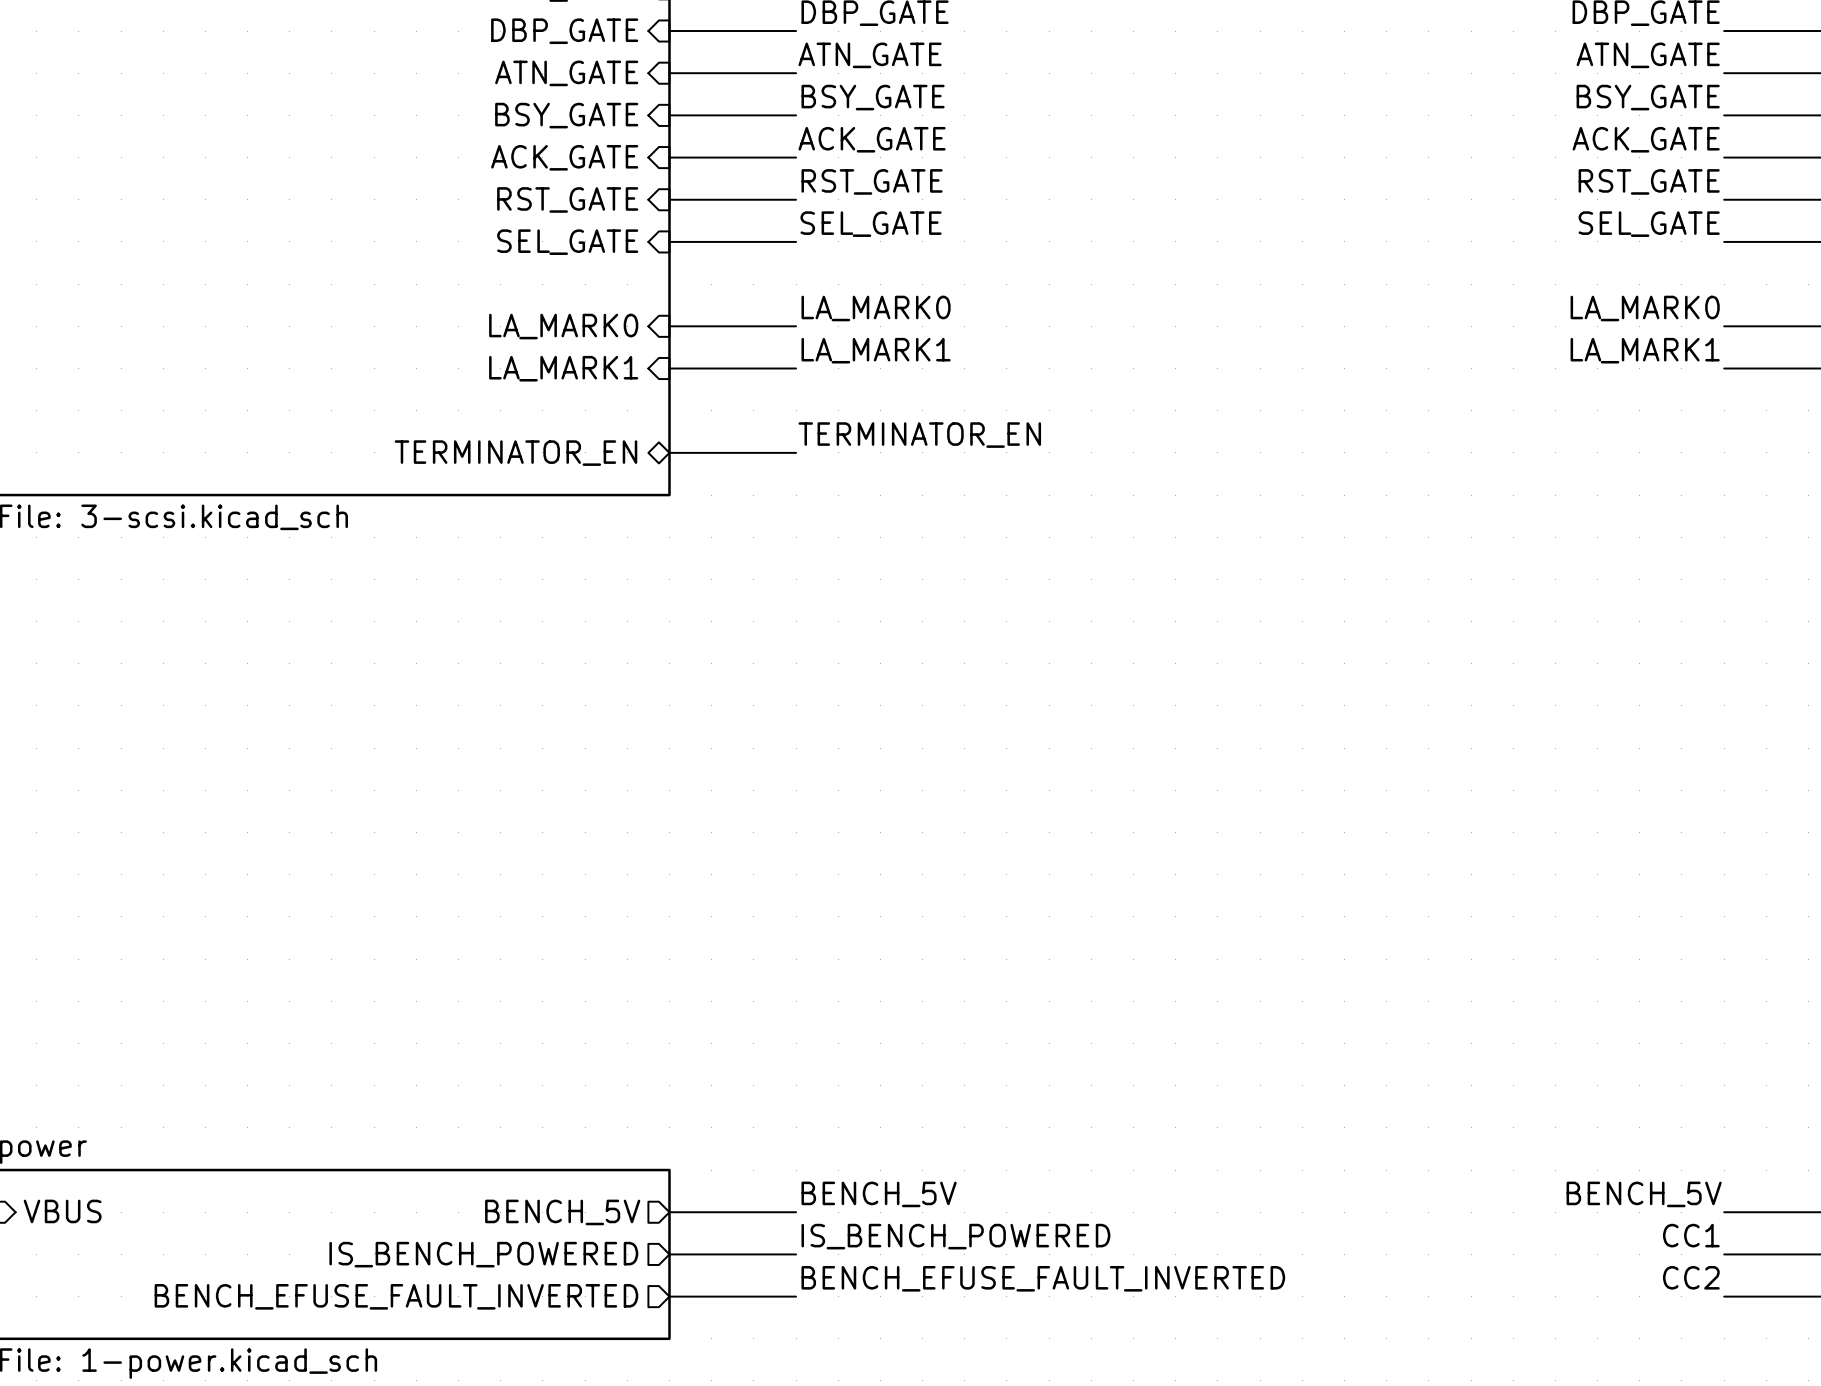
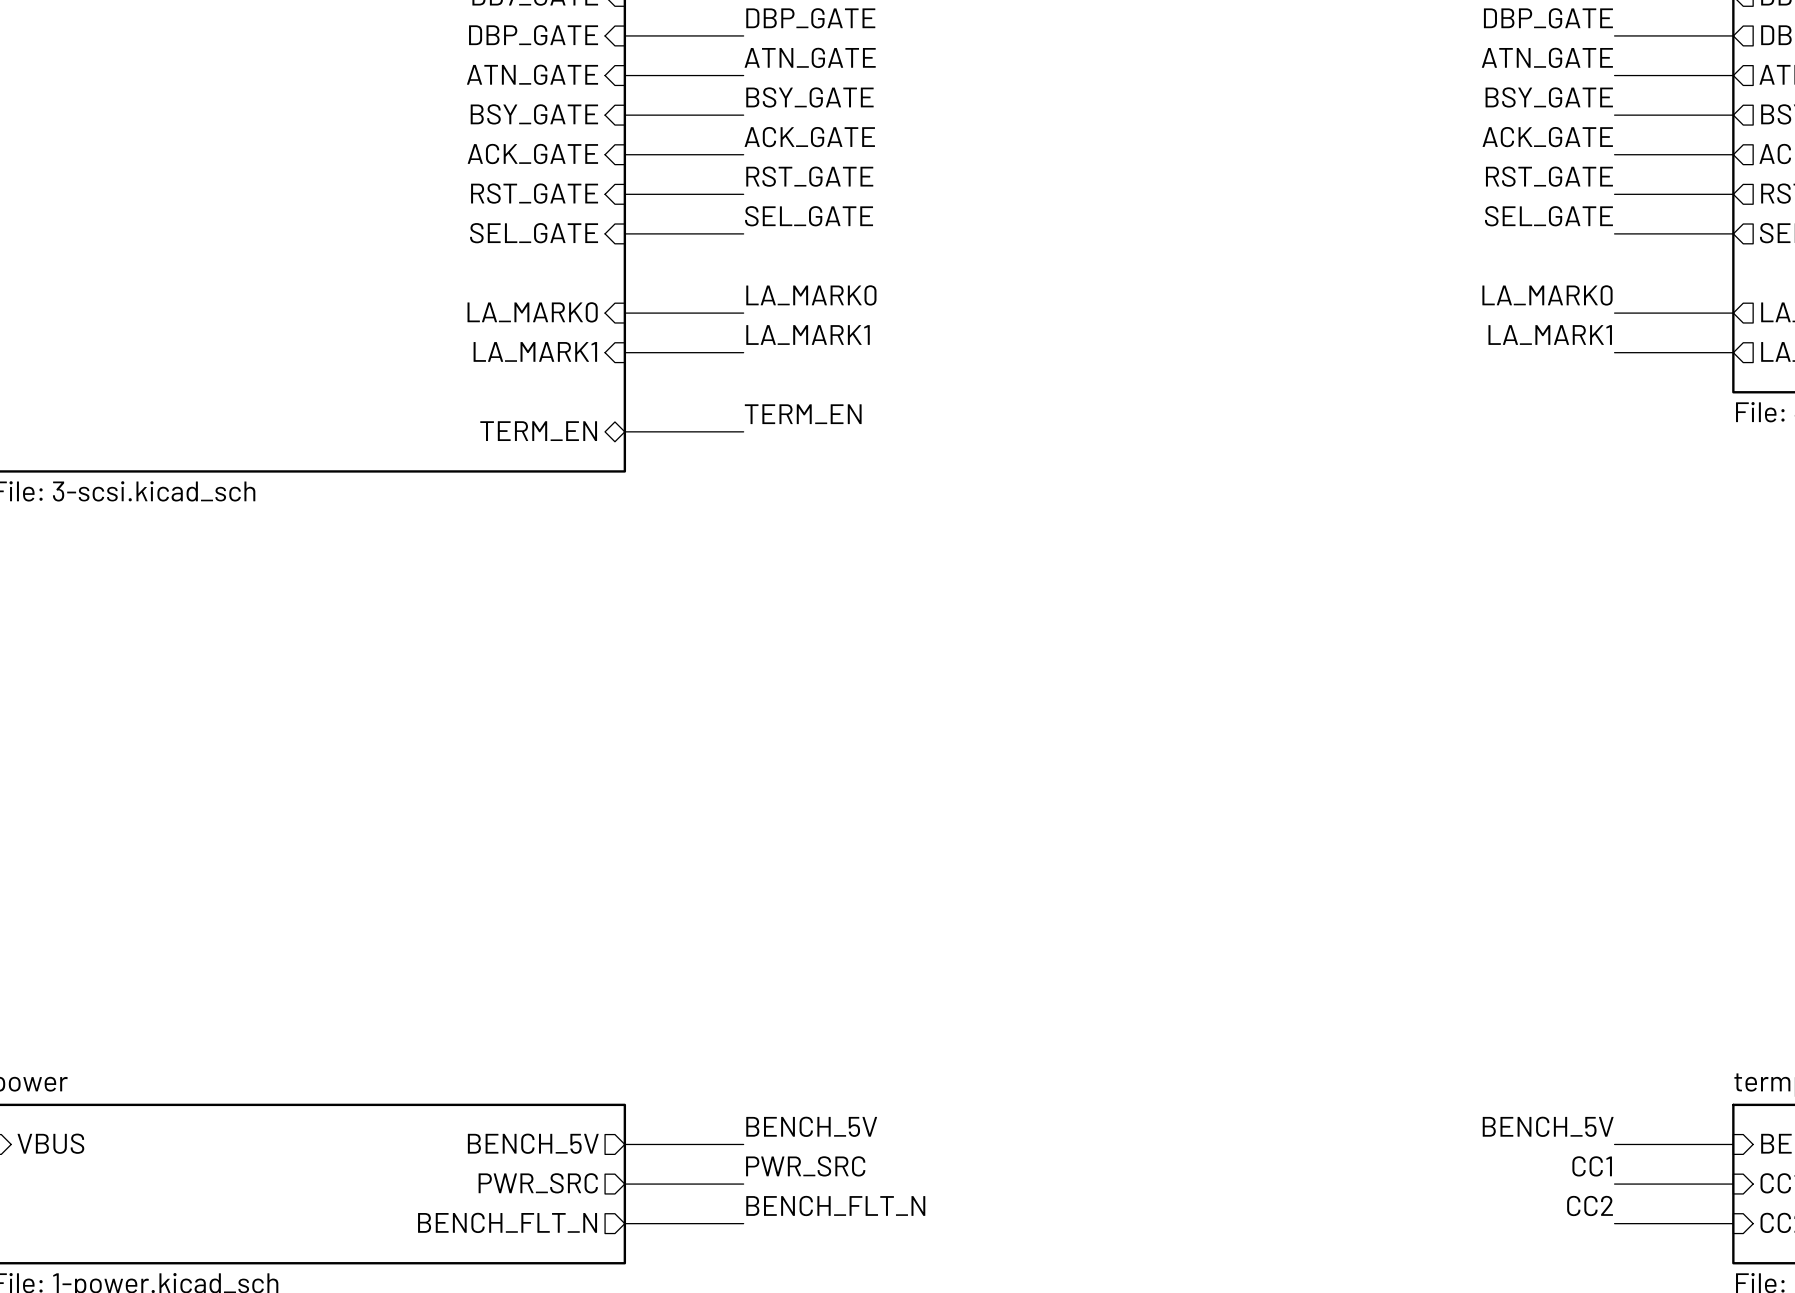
label: TERMINATOR_EN (919, 435) -> TERM_EN (803, 414)
sheet pin: TERMINATOR_EN (515, 453) -> TERM_EN (538, 431)
label: IS_BENCH_POWERED (955, 1236) -> PWR_SRC (805, 1166)
sheet pin: IS_BENCH_POWERED (483, 1254) -> PWR_SRC (538, 1183)
label: BENCH_EFUSE_FAULT_INVERTED (1043, 1278) -> BENCH_FLT_N (835, 1205)
sheet pin: BENCH_EFUSE_FAULT_INVERTED (396, 1296) -> BENCH_FLT_N (507, 1222)

